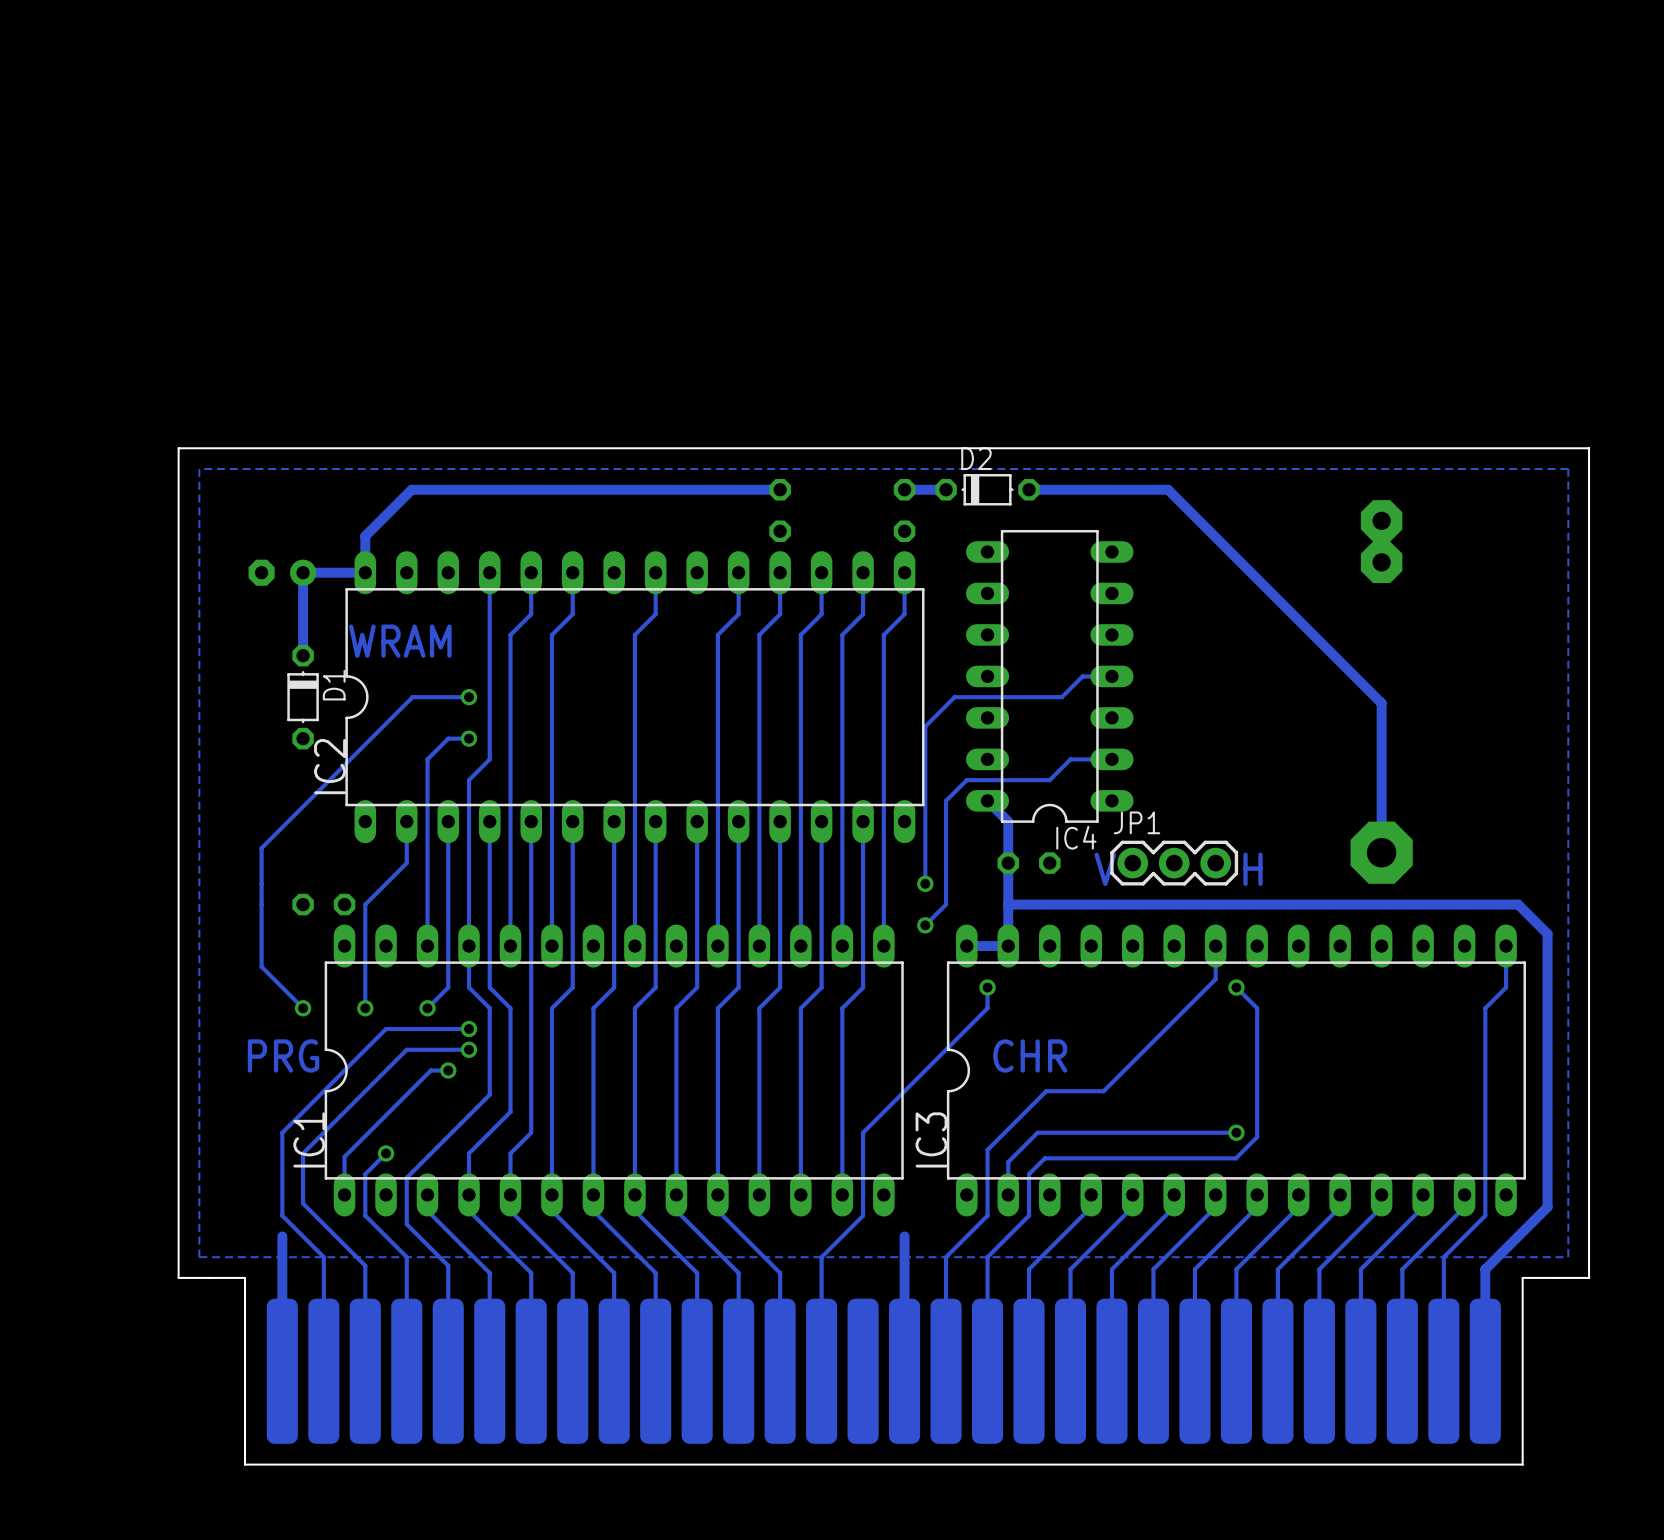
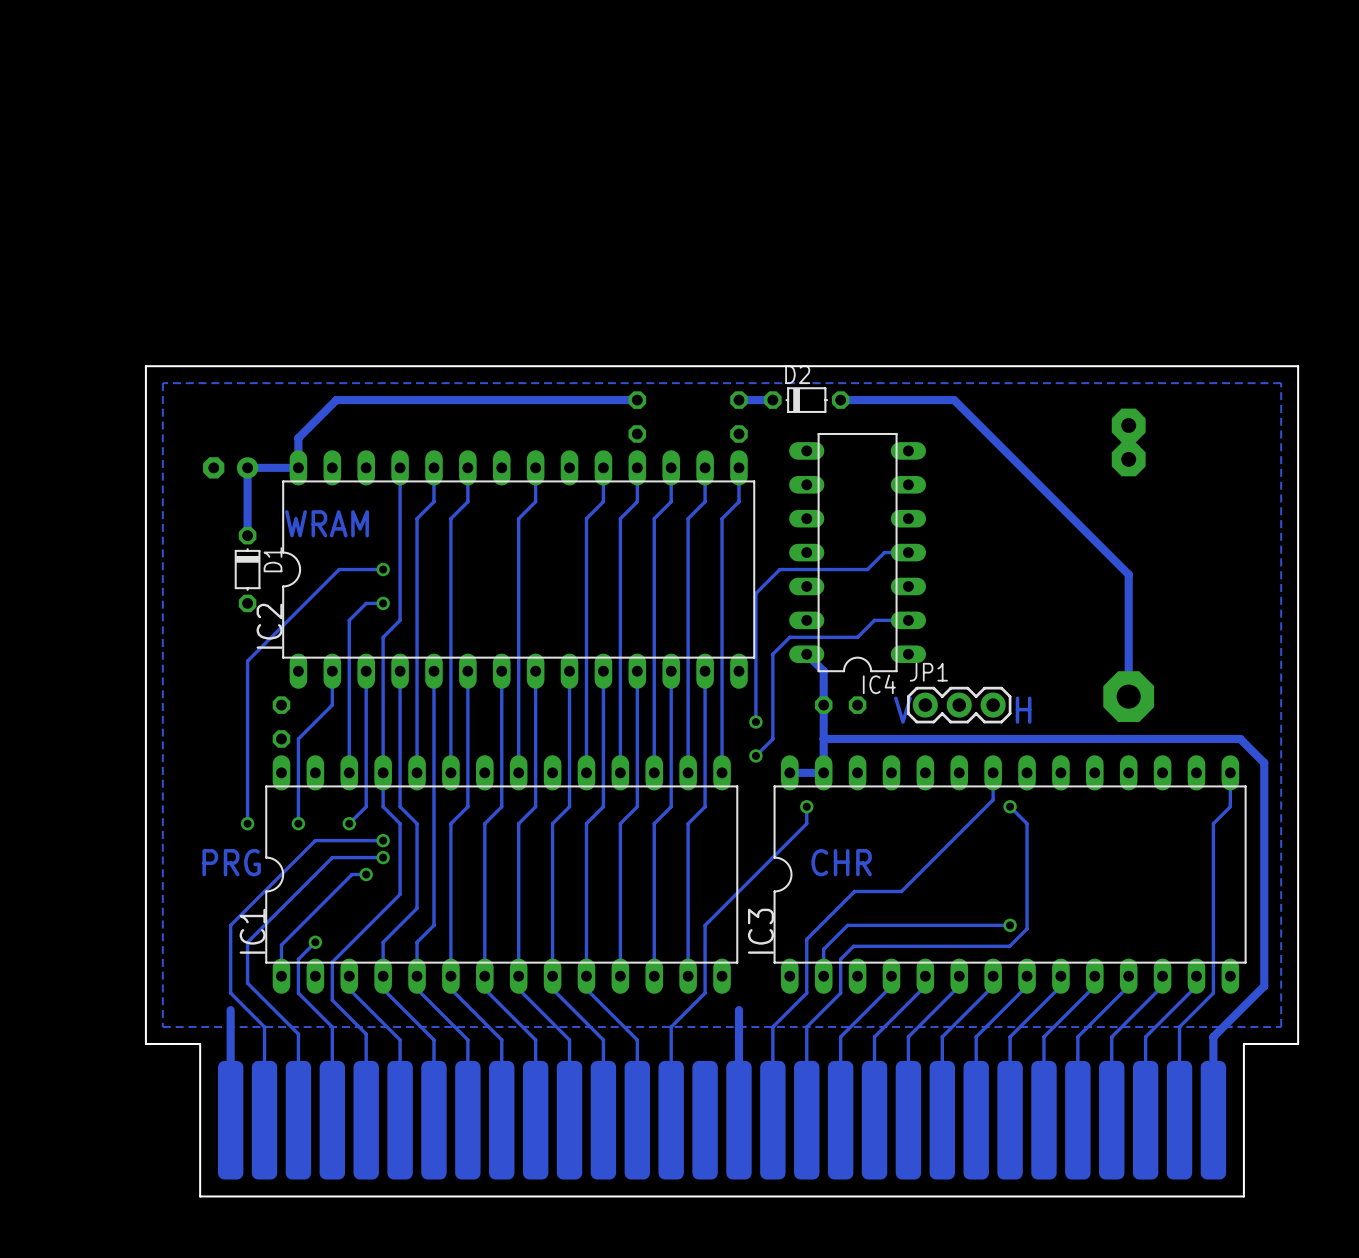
track: (415, 697) (412, 697) (261, 848) (261, 966) (303, 1008) -> (339, 569) (247, 661) (247, 823)
part rotation: 0° (323, 904) -> 90° clockwise (281, 722)

